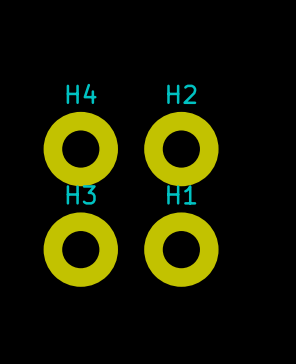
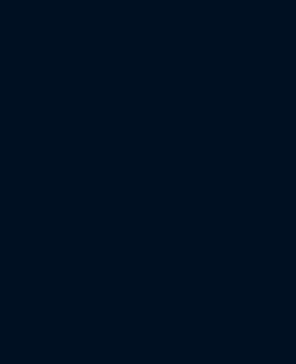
H4: (80, 149) -> none
H2: (181, 149) -> none
H3: (80, 249) -> none
H1: (181, 249) -> none

